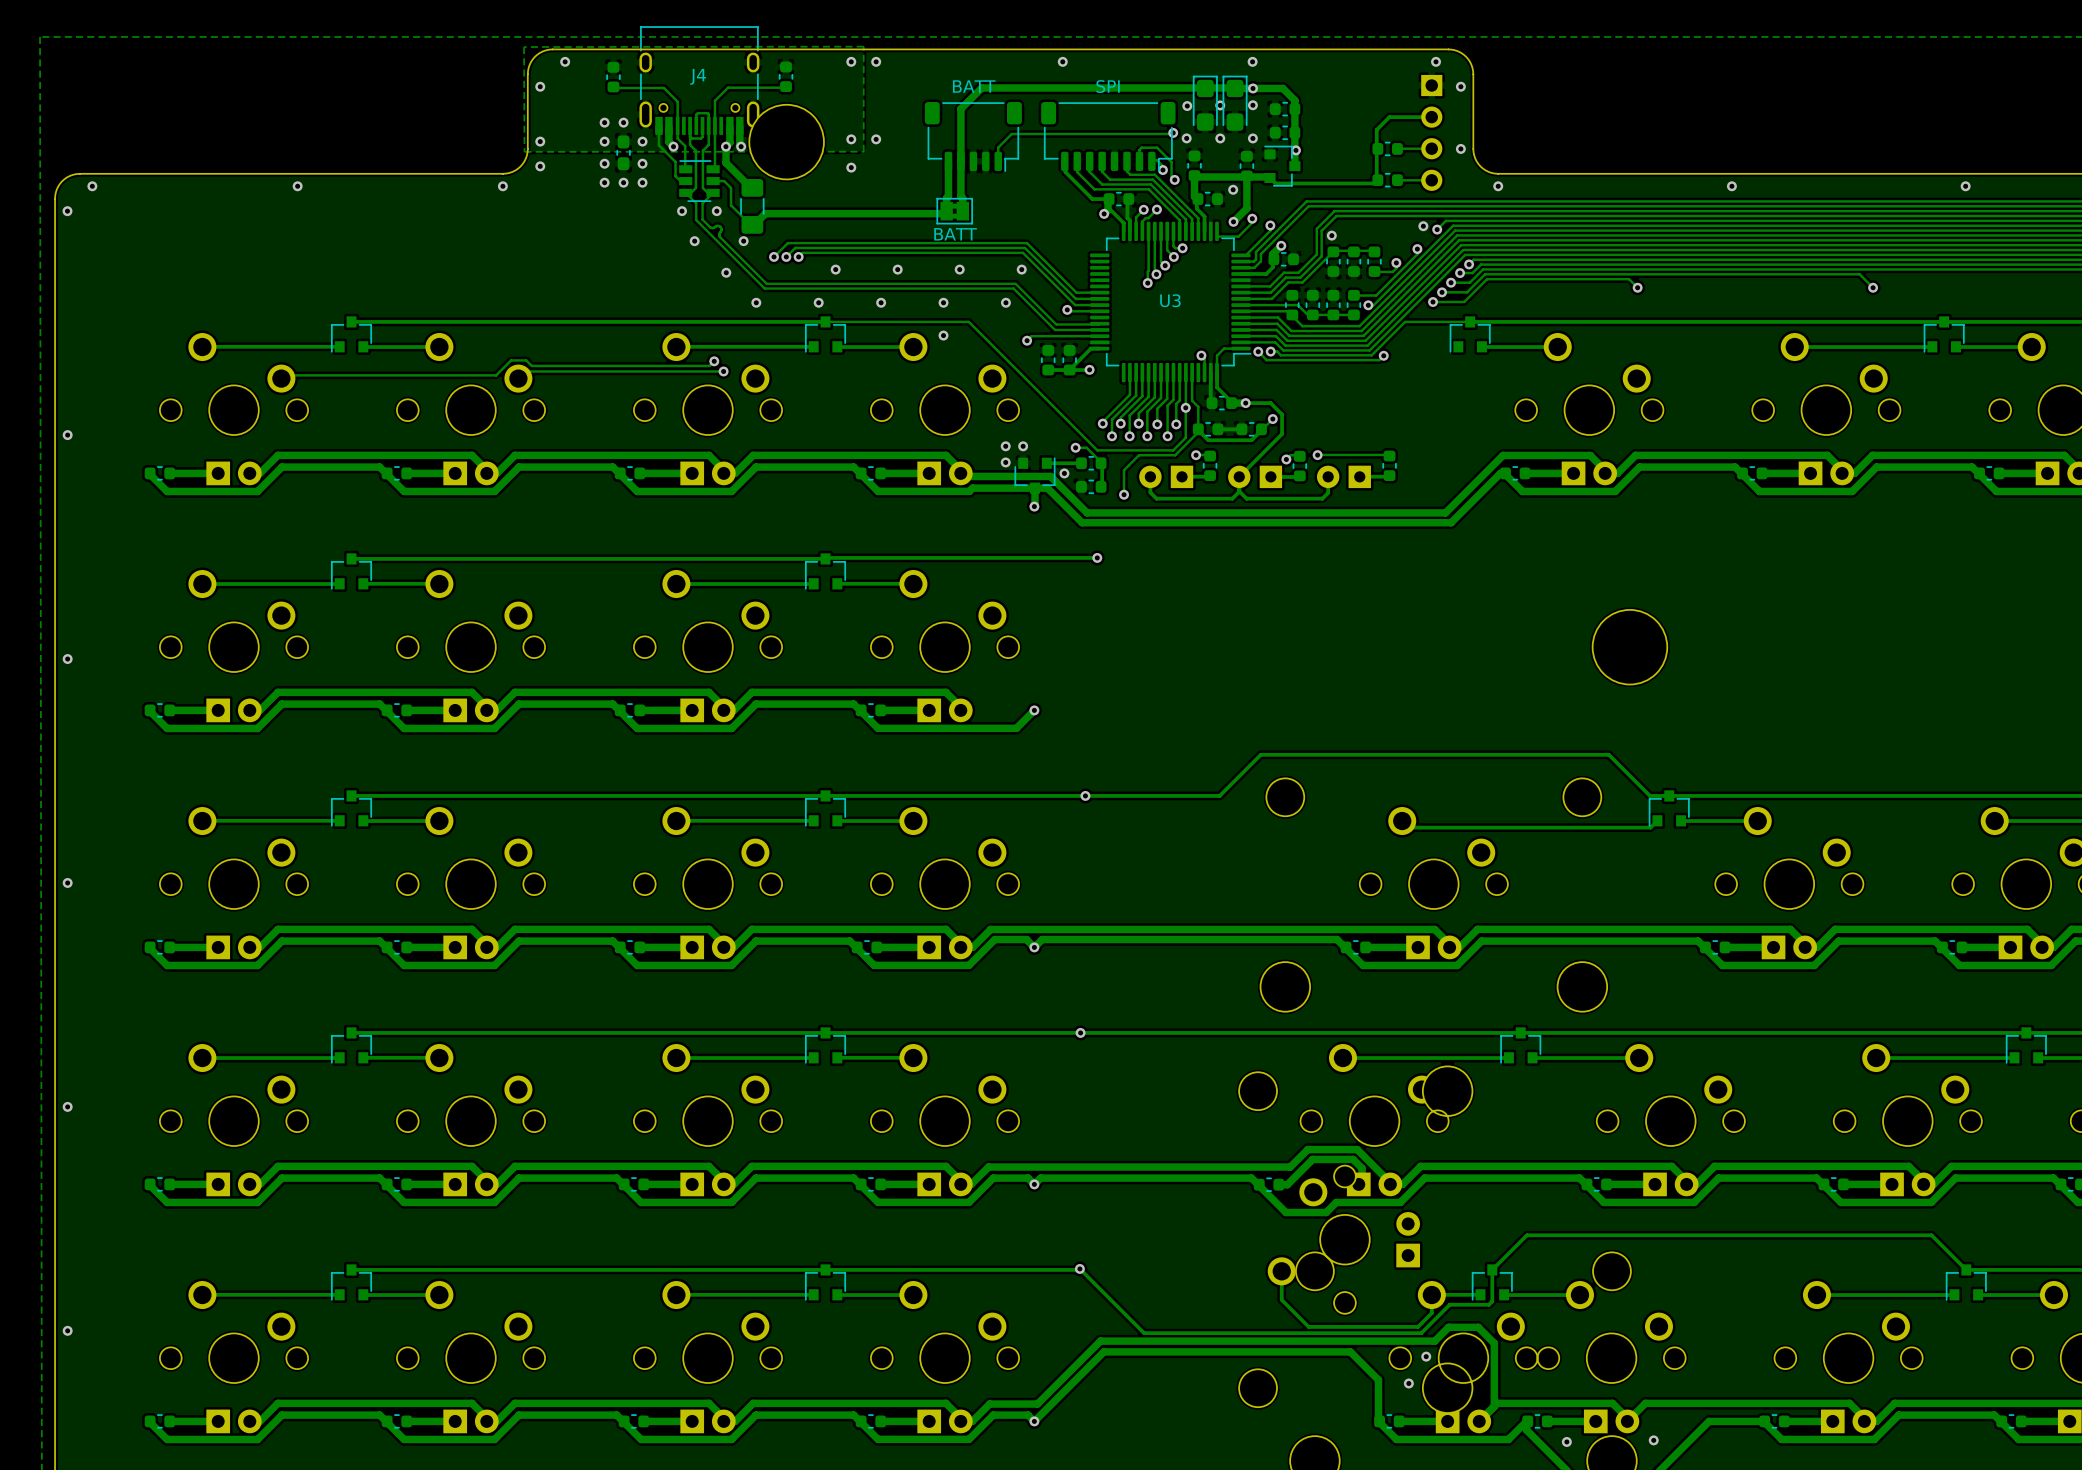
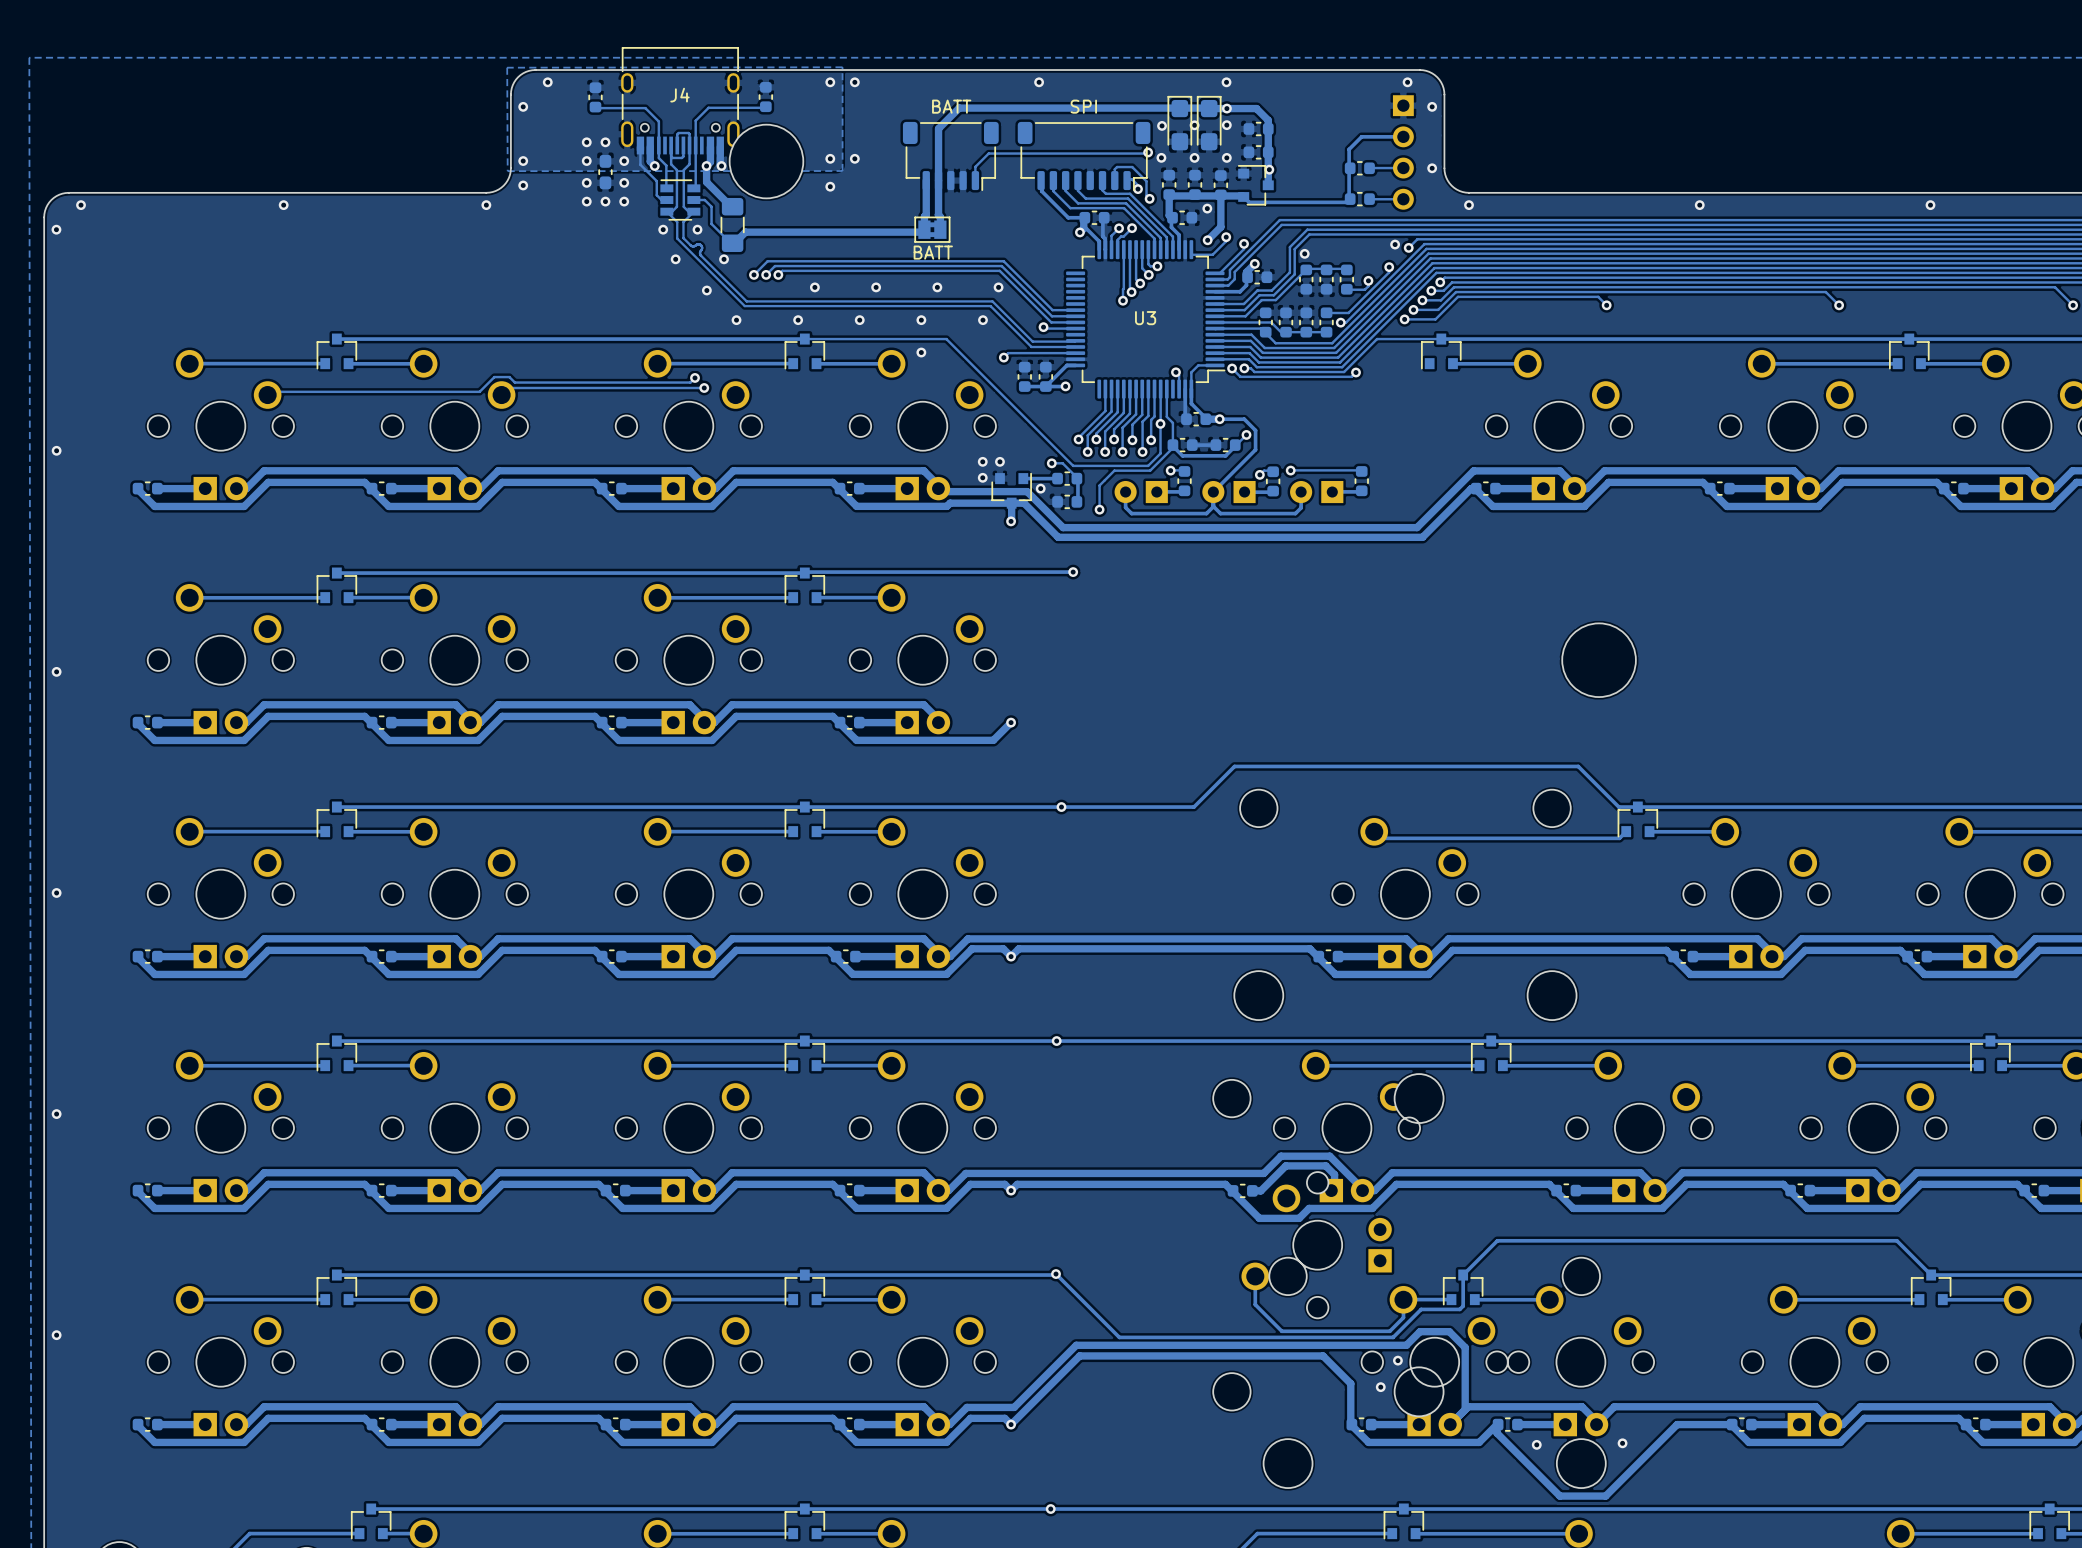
part: none -> (1195, 184)

